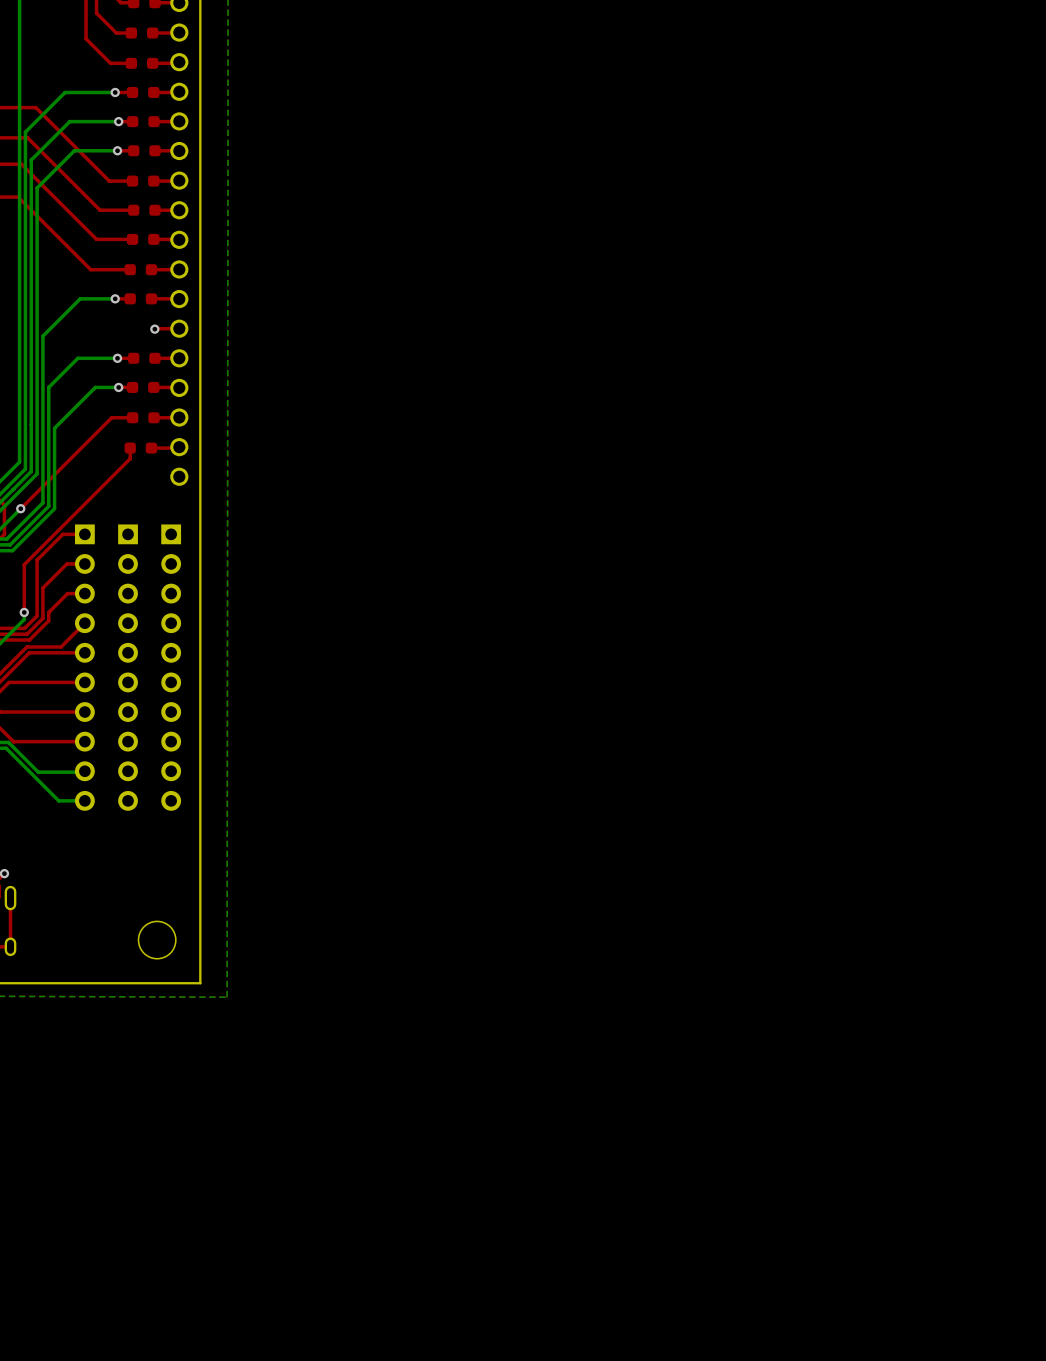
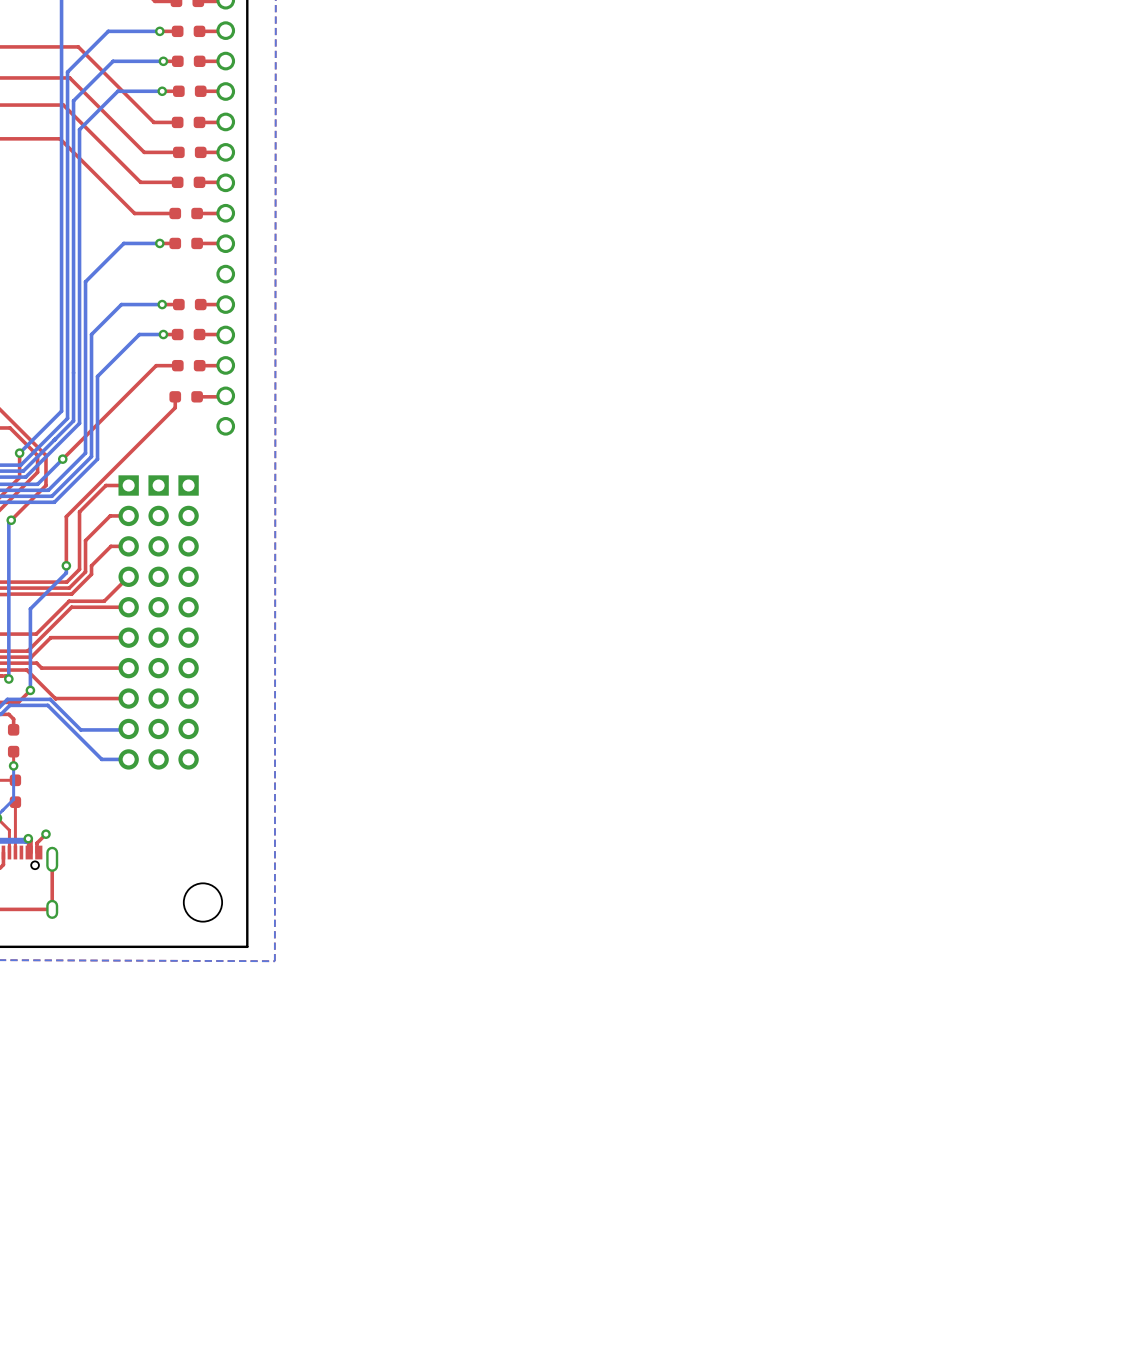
top track: (179, 328) (154, 329) -> none
via: (154, 329) -> none
part: none -> (158, 622)
part: (128, 667) -> none
part: none -> (188, 622)
part: (171, 667) -> none

